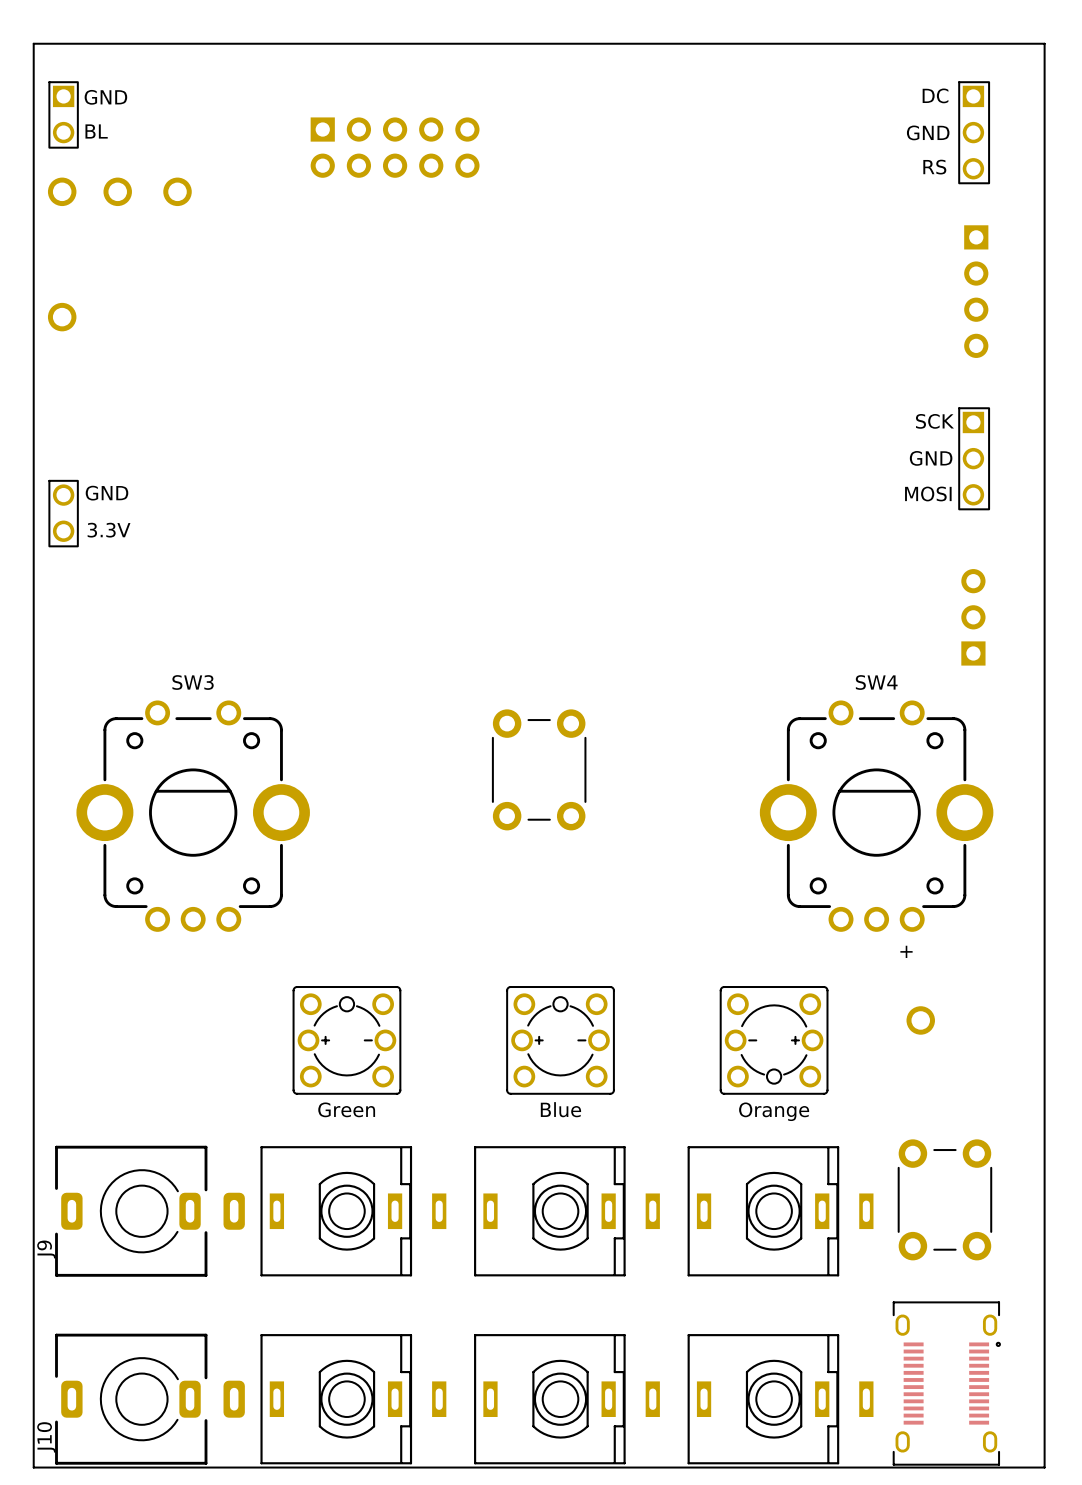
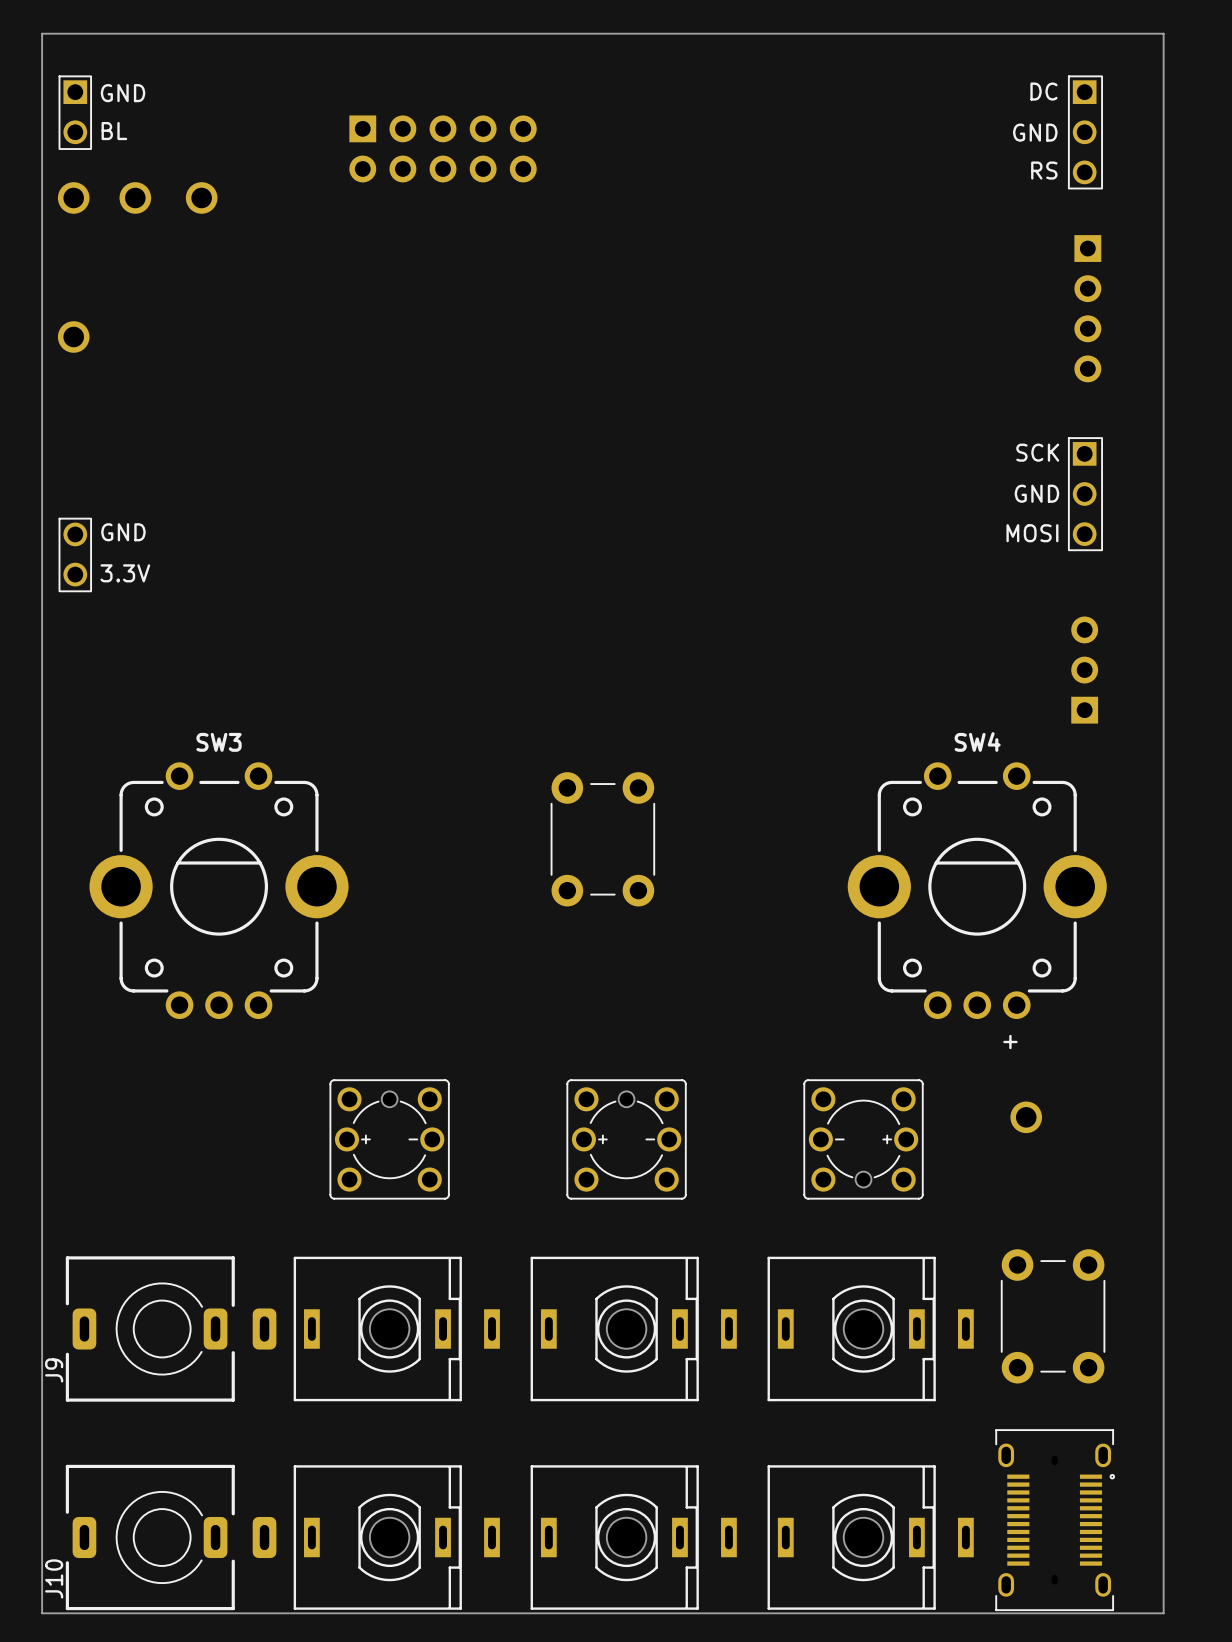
text: Green (346, 1109) -> none
text: Blue (560, 1109) -> none
text: Orange (774, 1111) -> none

